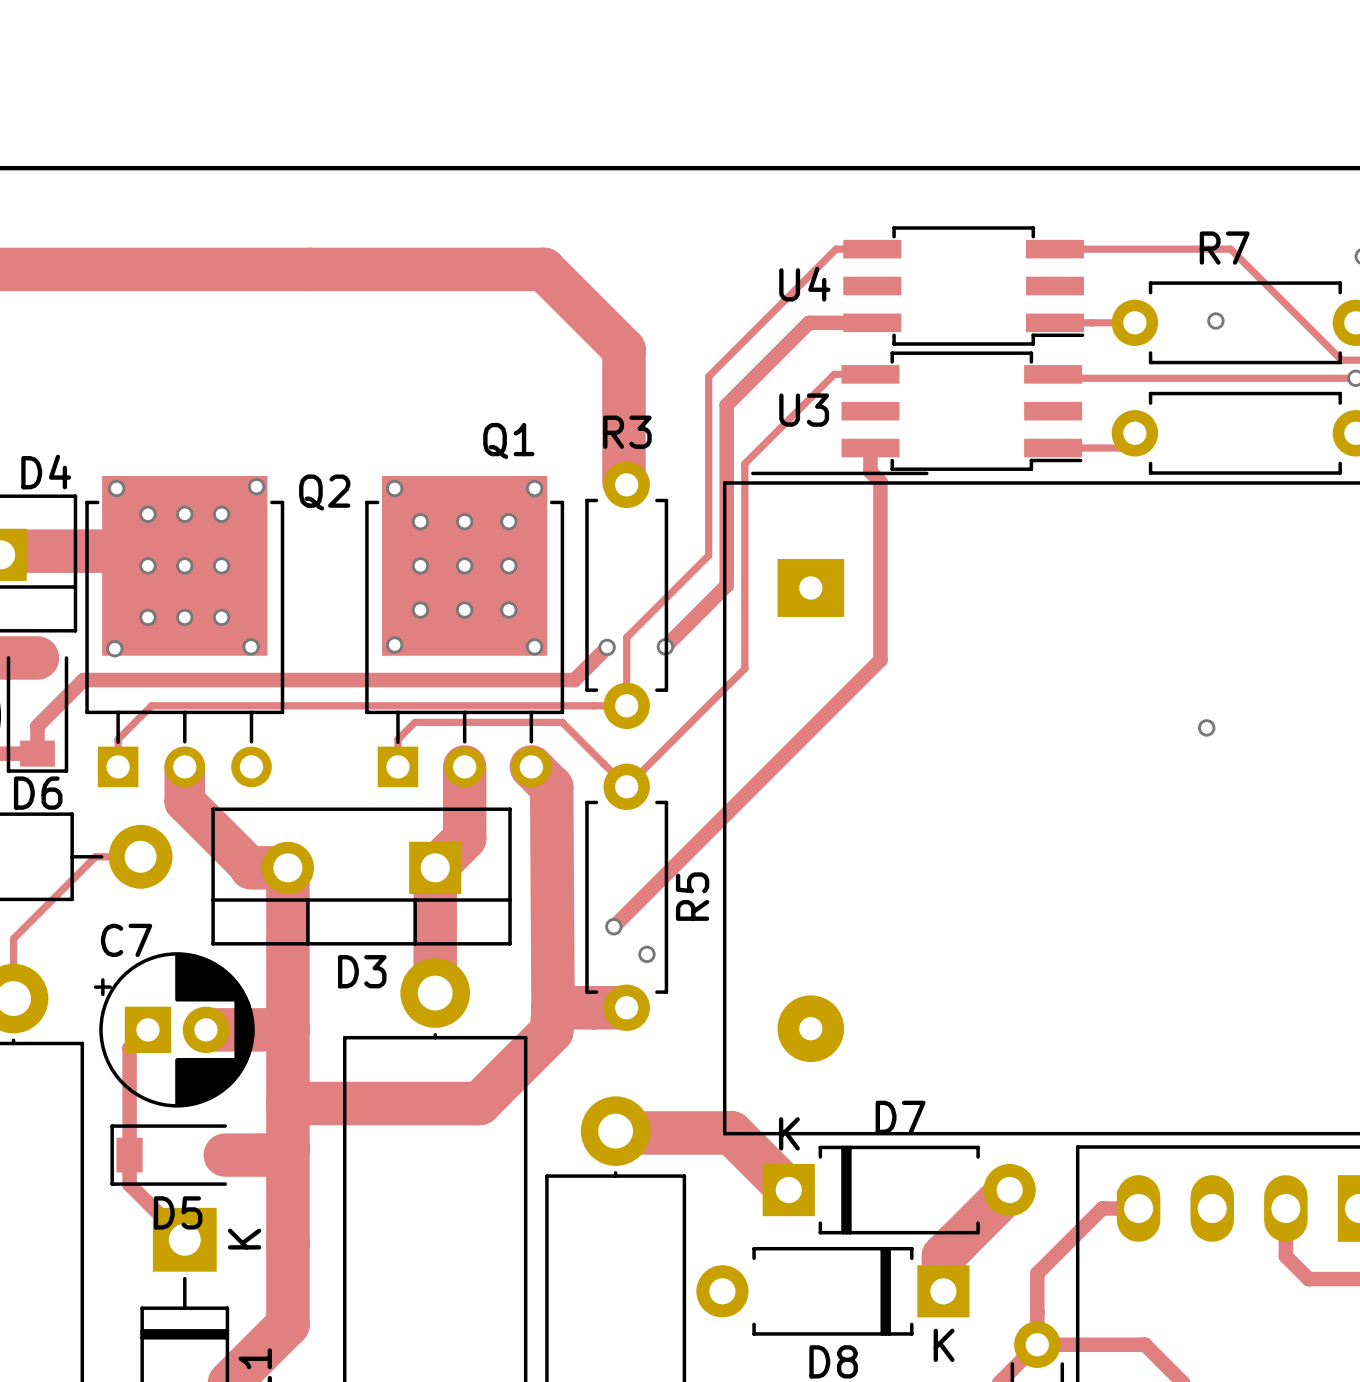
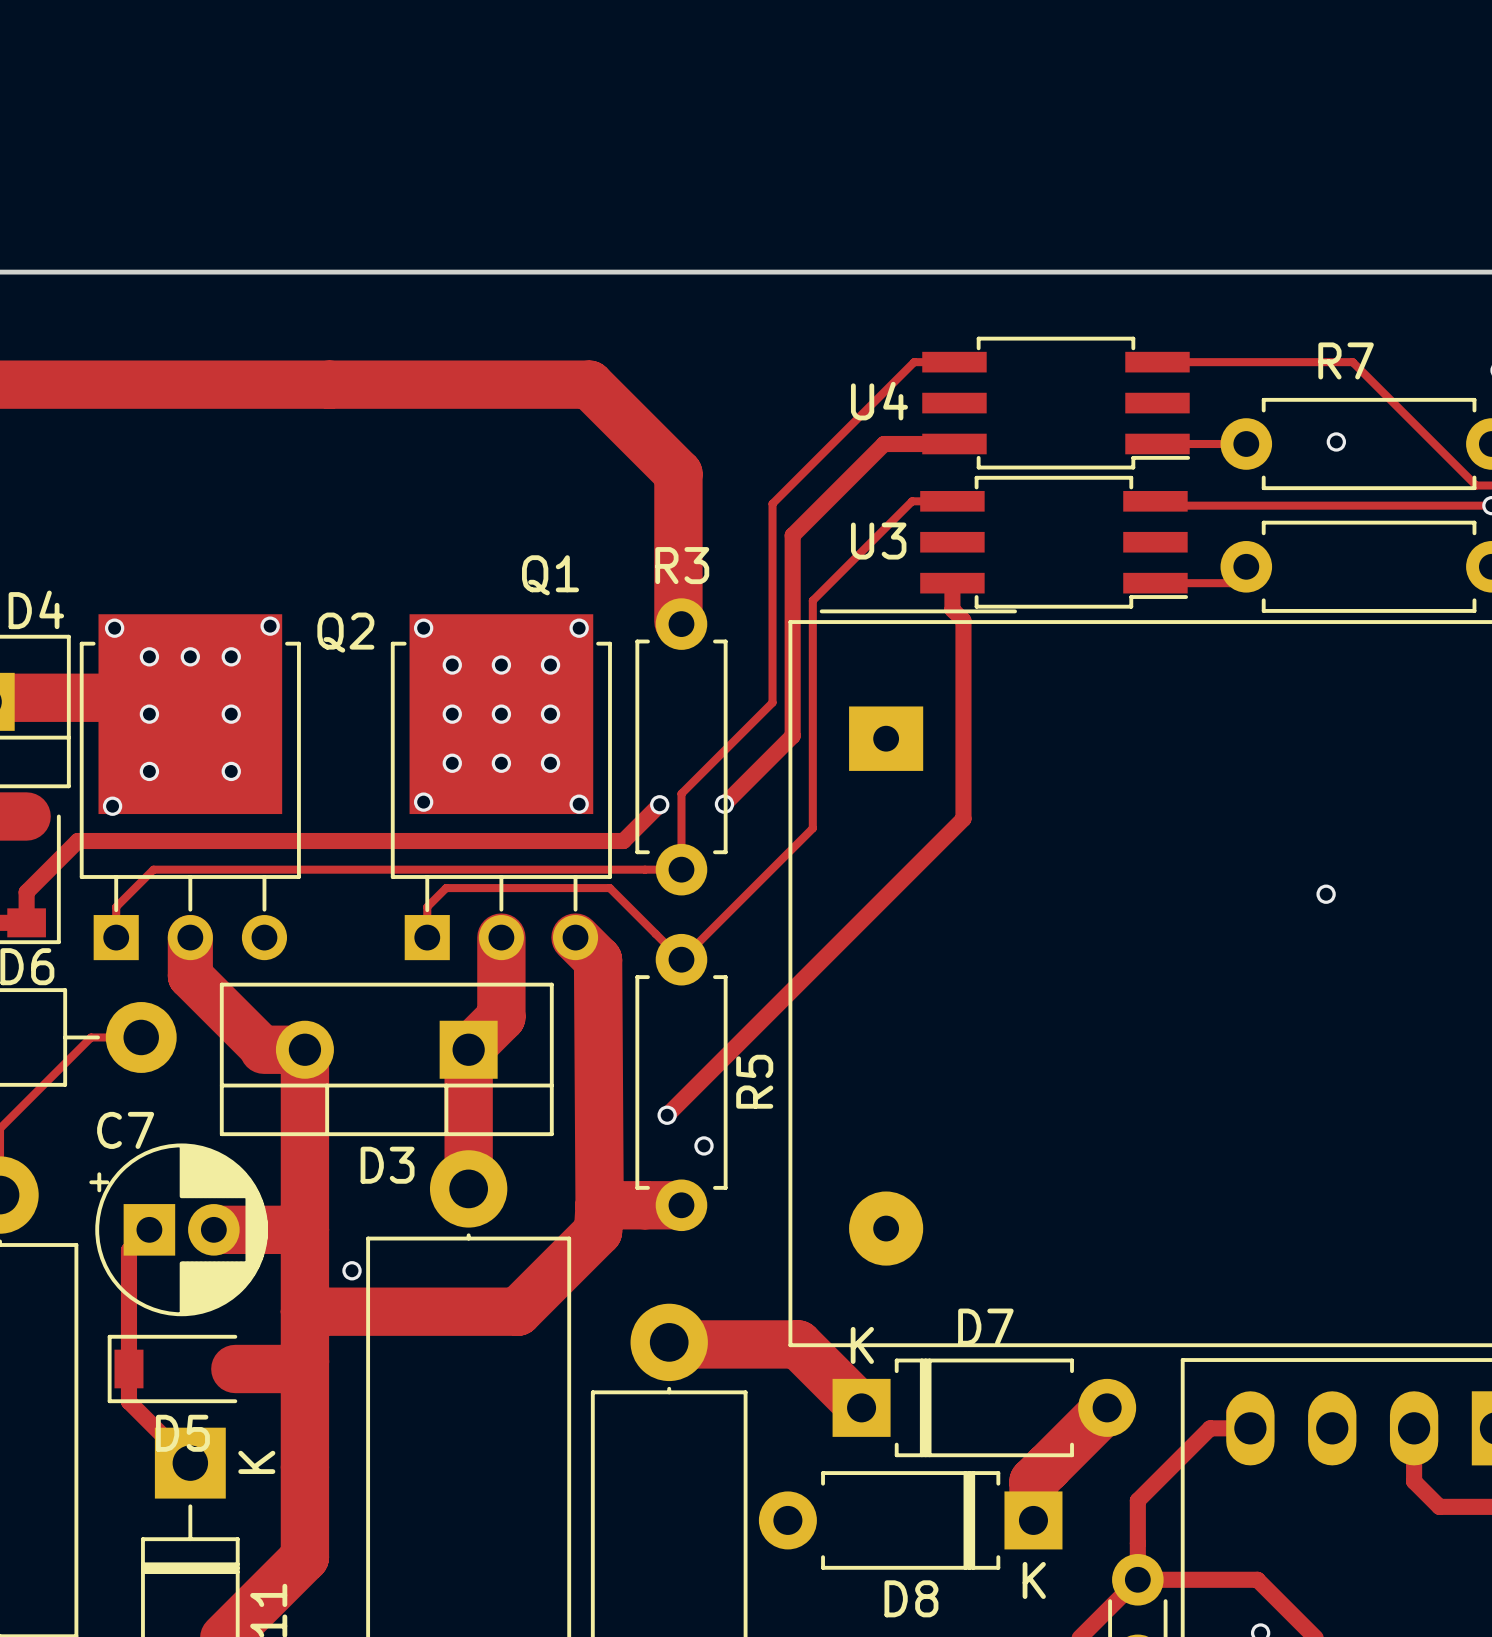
via: (184, 565) -> none
via: (184, 617) -> none
via: (251, 646) -> none
via: none -> (352, 1270)

